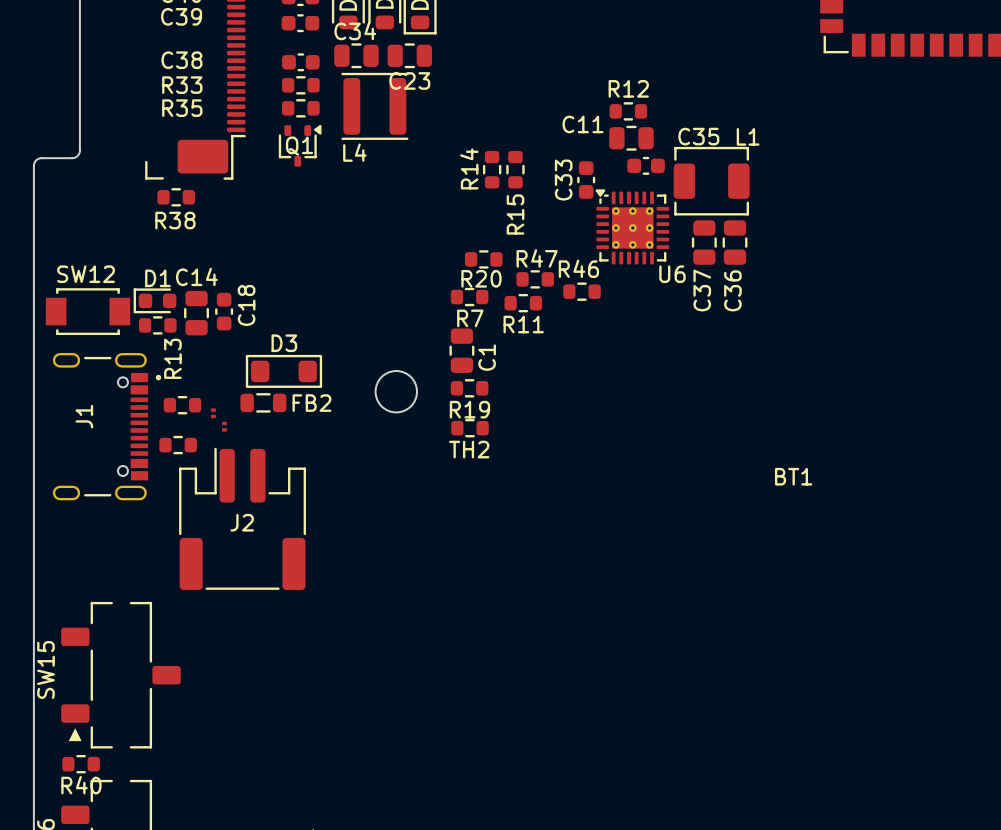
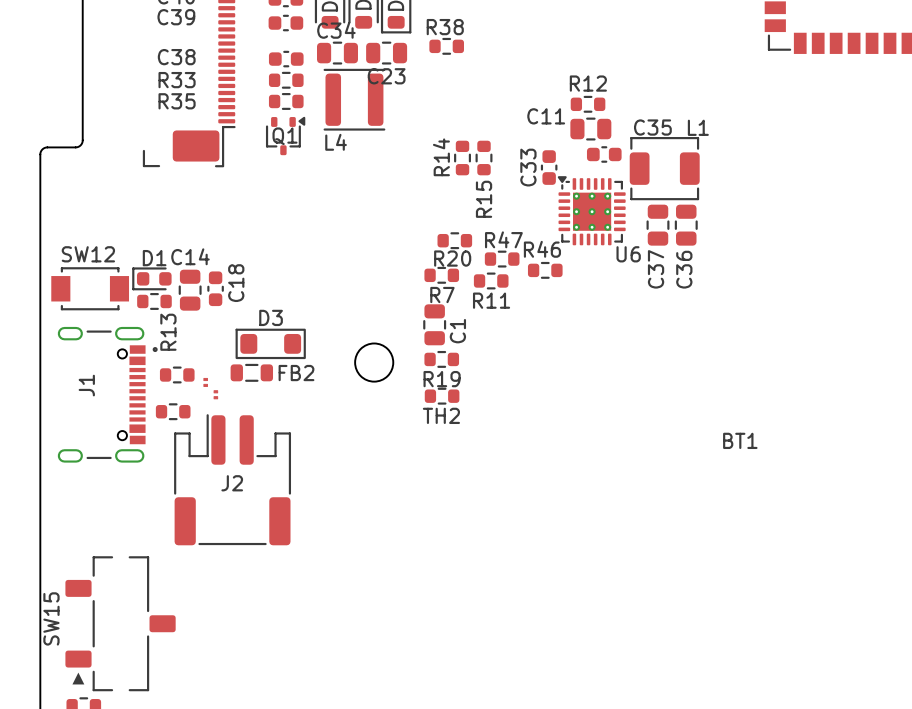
R38 position: (176, 197) -> (446, 46)
R38 name position: R38 (175, 220) -> R38 (445, 27)

